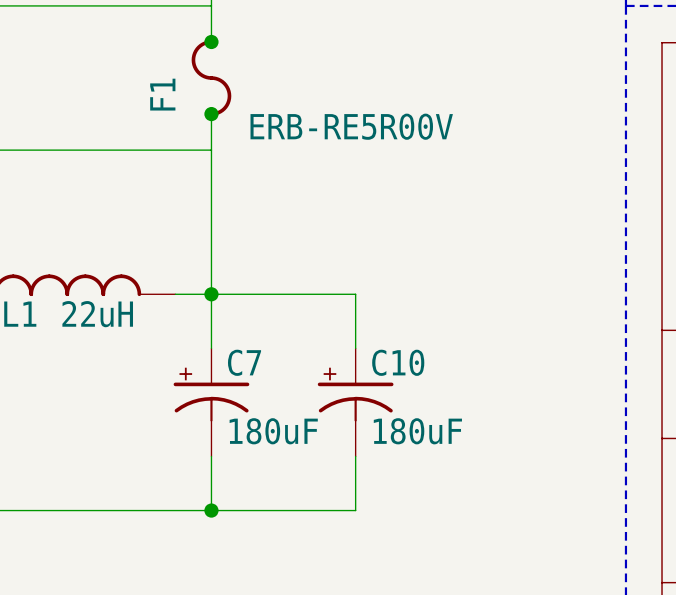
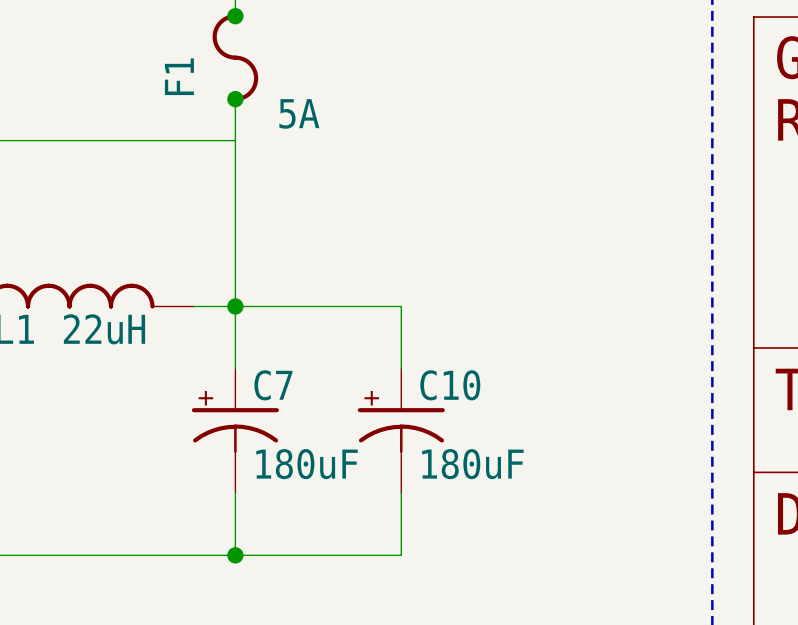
F1 value: ERB-RE5R00V (351, 126) -> 5A (299, 113)

